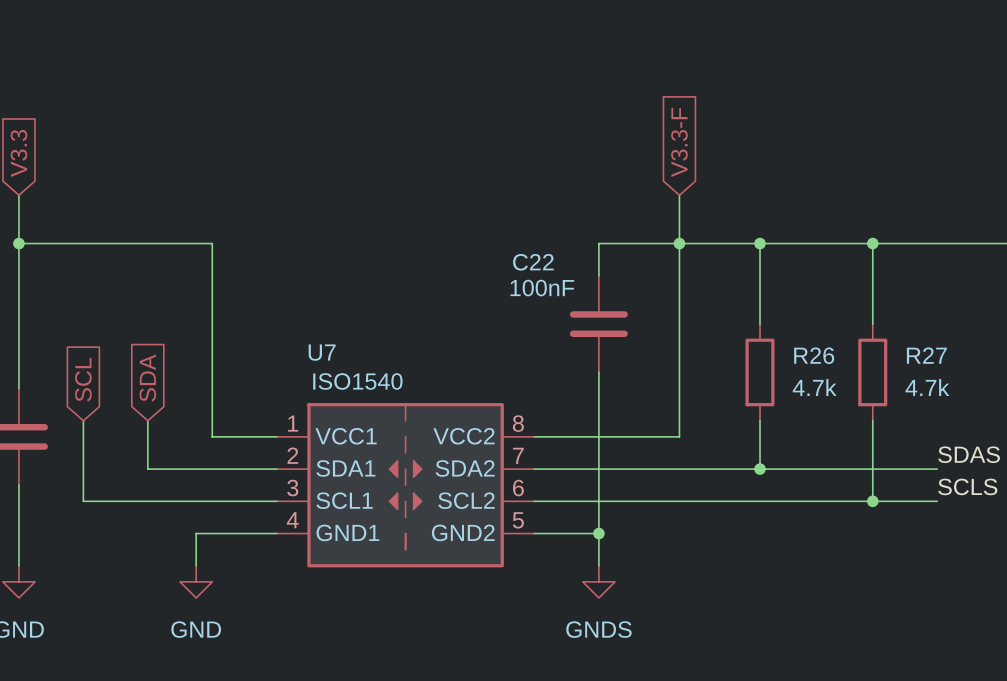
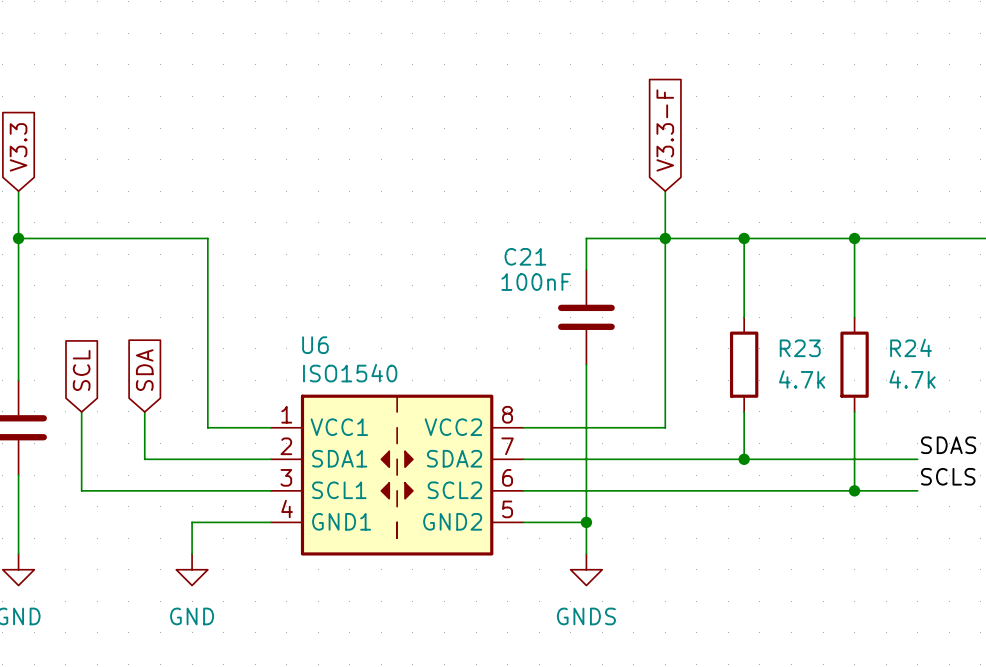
C22 name: C22 (533, 262) -> C21 (525, 256)
U7 name: U7 (322, 352) -> U6 (315, 345)
R26 name: R26 (814, 355) -> R23 (800, 348)
R27 name: R27 (926, 355) -> R24 (911, 347)

